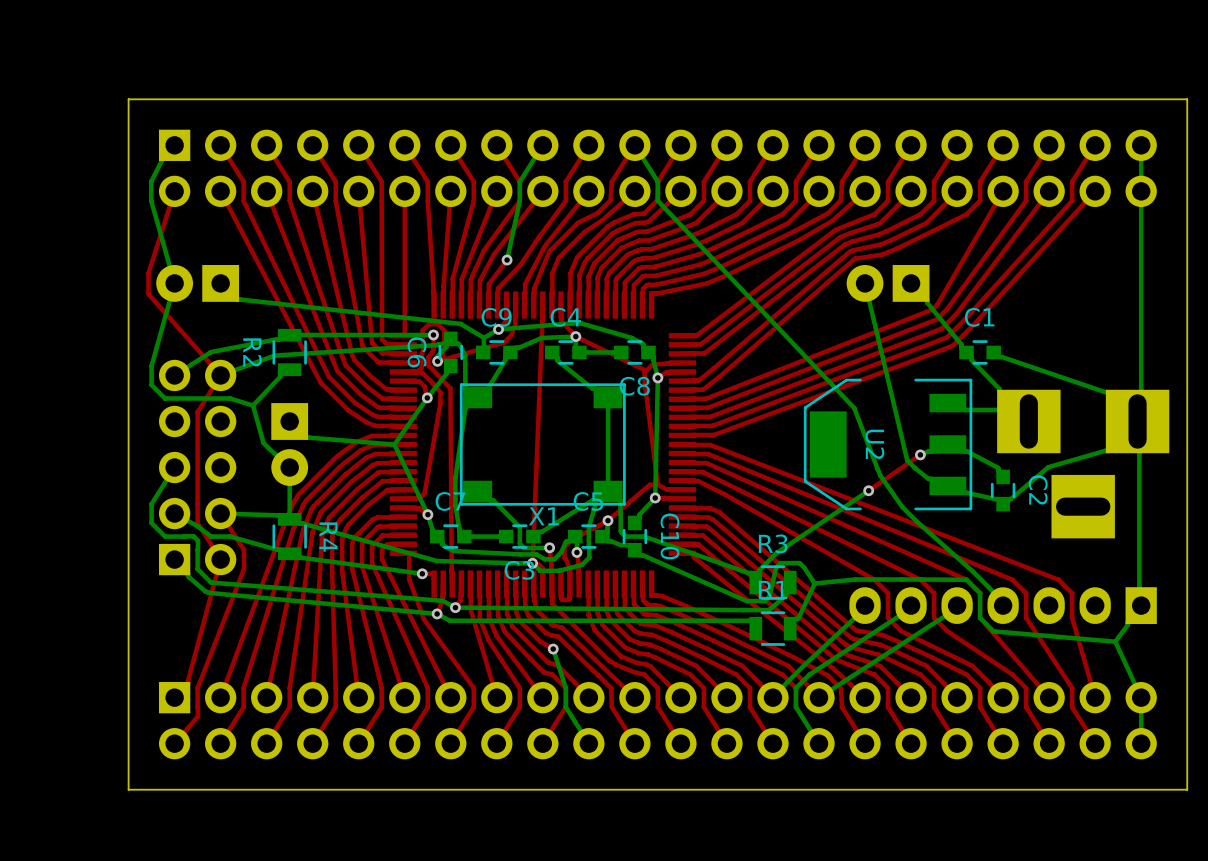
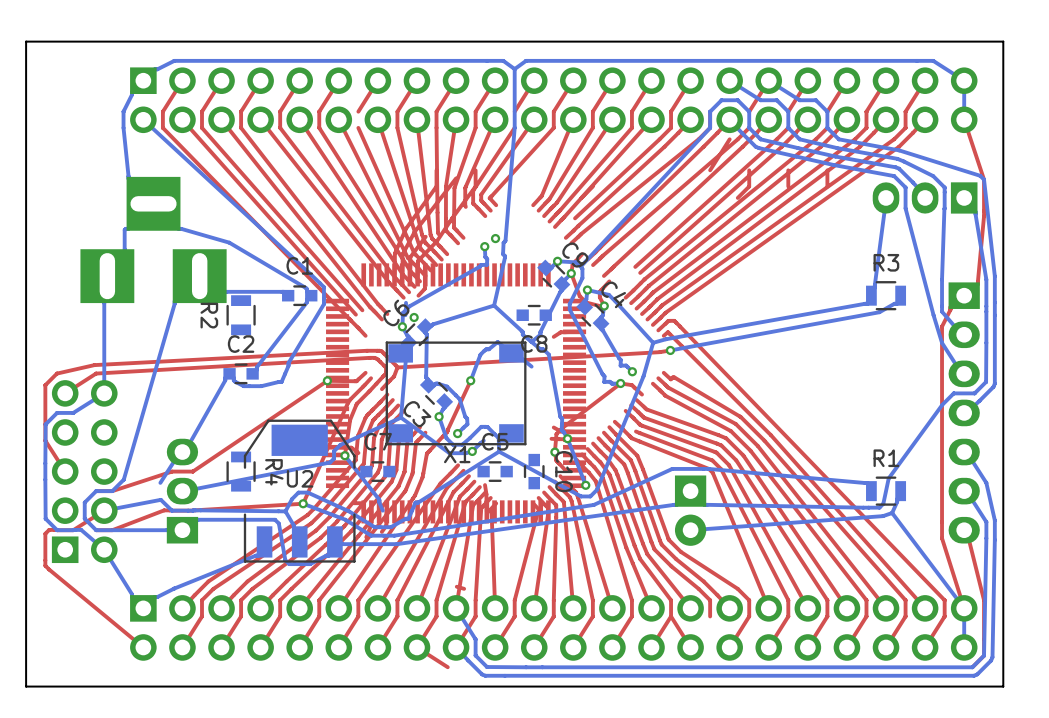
bottom track: none -> (503, 60) (174, 60)
bottom track: none -> (933, 60) (526, 60)
bottom track: none -> (174, 60) (154, 69) (132, 92) (123, 111)
bottom track: none -> (503, 60) (514, 69)
bottom track: none -> (525, 60) (514, 69)
bottom track: none -> (933, 60) (964, 80) (964, 119)
bottom track: none -> (514, 69) (514, 127) (505, 240) (503, 242) (503, 254) (504, 257) (494, 305)
top track: none -> (182, 80) (162, 111)
top track: none -> (221, 80) (202, 111)
top track: none -> (260, 80) (241, 111)
top track: none -> (299, 80) (280, 111)
top track: none -> (338, 80) (319, 111)
top track: none -> (377, 80) (358, 111)
top track: none -> (416, 80) (397, 111)
top track: none -> (456, 80) (436, 111)
bottom track: none -> (729, 80) (760, 100)
bottom track: none -> (768, 80) (799, 100)
bottom track: none -> (721, 100) (710, 111)
bottom track: none -> (737, 100) (749, 111)
bottom track: none -> (737, 100) (721, 100)
bottom track: none -> (776, 100) (788, 111)
bottom track: none -> (776, 100) (760, 100)
bottom track: none -> (815, 100) (827, 111)
bottom track: none -> (815, 100) (799, 100)
board edge: (1187, 99) (128, 99) (128, 789) -> (1003, 100) (1003, 41) (26, 41) (26, 686) (104, 686)
bottom track: none -> (123, 111) (128, 178) (178, 228) (229, 242) (305, 287) (311, 295) (252, 373)
top track: none -> (162, 111) (162, 127)
top track: none -> (241, 111) (241, 127)
top track: none -> (280, 111) (280, 127)
top track: none -> (319, 111) (319, 127)
top track: none -> (397, 111) (397, 127) (422, 234) (425, 242) (441, 259)
top track: none -> (436, 111) (438, 234)
top track: none -> (475, 111) (475, 127) (454, 188) (454, 227) (463, 237)
top track: none -> (553, 111) (553, 127)
bottom track: none -> (749, 111) (749, 127)
bottom track: none -> (788, 111) (788, 127)
bottom track: none -> (827, 111) (827, 127)
bottom track: none -> (143, 119) (323, 287) (323, 304) (288, 363) (281, 381) (261, 386) (243, 386) (234, 381) (229, 373) (225, 377) (184, 452) (180, 452) (160, 482)
top track: none -> (182, 119) (355, 314)
top track: none -> (221, 119) (369, 306) (381, 319)
top track: none -> (260, 119) (388, 282) (403, 297)
top track: none -> (299, 119) (402, 274) (414, 286)
top track: none -> (338, 119) (407, 257) (425, 275)
top track: none -> (377, 119) (418, 244) (420, 249) (436, 265)
top track: none -> (416, 119) (430, 234) (447, 254)
top track: none -> (456, 119) (446, 186) (445, 230) (458, 243)
top track: none -> (495, 119) (465, 188) (465, 206)
top track: none -> (534, 119) (481, 194) (481, 200) (490, 210)
top track: none -> (573, 119) (541, 196) (533, 205)
top track: none -> (612, 119) (557, 202) (544, 216)
top track: none -> (651, 119) (554, 227)
top track: none -> (690, 119) (664, 146) (565, 237)
bottom track: none -> (729, 119) (758, 148) (894, 176)
top track: none -> (729, 119) (587, 259)
top track: none -> (768, 119) (742, 146) (603, 275)
top track: none -> (807, 119) (781, 146) (640, 272)
top track: none -> (846, 119) (820, 146) (649, 285) (631, 303)
top track: none -> (886, 119) (860, 146) (657, 298)
top track: none -> (925, 119) (899, 146) (665, 312) (652, 324)
top track: none -> (964, 119) (984, 179) (984, 216) (977, 284) (950, 307) (942, 326)
top track: none -> (162, 127) (365, 335)
top track: none -> (202, 127) (362, 310)
top track: none -> (241, 127) (387, 314)
top track: none -> (280, 127) (395, 278) (409, 292)
top track: none -> (319, 127) (410, 271) (420, 281)
top track: none -> (358, 127) (414, 253) (430, 270)
top track: none -> (514, 127) (473, 190) (473, 203) (485, 216)
top track: none -> (553, 127) (489, 198) (496, 205)
top track: none -> (592, 127) (549, 199) (538, 210)
top track: none -> (631, 127) (549, 221)
top track: none -> (671, 127) (575, 218)
bottom track: none -> (710, 127) (580, 266)
top track: none -> (710, 127) (571, 243)
bottom track: none -> (749, 127) (760, 139)
top track: none -> (749, 127) (593, 265)
bottom track: none -> (788, 127) (799, 139)
top track: none -> (788, 127) (635, 266)
bottom track: none -> (827, 127) (838, 139)
top track: none -> (827, 127) (815, 139) (644, 279) (625, 297)
top track: none -> (866, 127) (855, 139) (653, 292) (636, 308)
top track: none -> (905, 127) (894, 139) (662, 305)
bottom track: (174, 145) (161, 158) (151, 181) -> none
top track: (220, 145) (243, 181) -> none
top track: (266, 145) (289, 181) -> none
top track: (312, 145) (335, 181) -> none
top track: (358, 145) (381, 181) -> none
top track: (404, 145) (427, 181) -> none
top track: (450, 145) (473, 181) -> none
top track: (496, 145) (519, 181) -> none
bottom track: (542, 145) (519, 181) -> none
top track: (588, 145) (565, 181) -> (495, 80) (475, 111)
bottom track: (634, 145) (657, 181) -> none
top track: (634, 145) (611, 181) -> (534, 80) (514, 111)
top track: (680, 145) (657, 181) -> (573, 80) (553, 111)
top track: (726, 145) (703, 181) -> (612, 80) (592, 111)
top track: (772, 145) (749, 181) -> (651, 80) (631, 111)
top track: (819, 145) (796, 181) -> (690, 80) (671, 111)
bottom track: none -> (760, 139) (835, 156) (895, 167) (912, 182) (925, 197)
top track: (911, 145) (888, 181) -> (768, 80) (749, 111)
bottom track: none -> (799, 139) (897, 158) (933, 176) (944, 187) (942, 311) (961, 334) (964, 334)
top track: (957, 145) (934, 181) -> (807, 80) (788, 111)
bottom track: none -> (838, 139) (899, 150) (980, 175) (984, 179) (994, 276) (994, 383) (979, 400) (964, 412)
top track: (1003, 145) (980, 181) -> (846, 80) (827, 111)
top track: (1049, 145) (1026, 181) -> (886, 80) (866, 111)
top track: (1095, 145) (1072, 181) -> (925, 80) (905, 111)
bottom track: (1141, 145) (1141, 392) (1137, 421) -> none
part position: (657, 168) -> (553, 100)
bottom track: (151, 181) (151, 200) (174, 283) (151, 365) (151, 384) -> none
top track: (243, 181) (243, 200) -> (201, 111) (201, 127)
top track: (289, 181) (289, 200) (345, 365) (382, 398) (403, 399) -> none
top track: (335, 181) (335, 200) (362, 345) (377, 361) (403, 362) -> none
top track: (381, 181) (382, 339) (387, 344) (403, 344) -> none
top track: (427, 181) (434, 304) -> none
top track: (473, 181) (473, 200) (452, 278) (452, 304) -> none
bottom track: (519, 181) (519, 200) (507, 260) -> none
top track: (611, 181) (610, 200) (597, 213) (577, 223) (549, 252) (534, 288) (533, 304) -> none
bottom track: (657, 181) (657, 200) -> (710, 111) (710, 127)
top track: (657, 181) (657, 200) (644, 213) (633, 214) (608, 226) (577, 257) (570, 273) (570, 304) -> none
top track: (703, 181) (703, 200) -> (592, 111) (592, 127)
top track: (749, 181) (749, 200) -> (631, 111) (631, 127)
top track: (795, 181) (795, 200) -> (671, 111) (671, 127)
top track: (842, 181) (840, 200) (828, 213) (703, 273) (646, 285) (642, 288) (642, 304) -> none
top track: (1026, 181) (1026, 200) -> (866, 111) (866, 127)
top track: (1072, 181) (1072, 200) -> (905, 111) (905, 127)
bottom track: none -> (894, 176) (905, 187) (905, 208) (942, 342)
top track: (174, 191) (148, 273) (148, 293) (220, 375) (197, 411) -> none
top track: (220, 191) (321, 383) (348, 410) (366, 422) (375, 425) (403, 426) -> none
top track: (266, 191) (337, 371) (360, 394) (377, 407) (403, 408) -> none
top track: (312, 191) (354, 359) (386, 389) (403, 390) -> none
top track: (358, 191) (372, 342) (382, 353) (403, 353) -> none
top track: (404, 191) (403, 335) -> none
top track: (450, 191) (443, 304) -> none
top track: (496, 191) (461, 279) (461, 304) -> none
top track: (588, 191) (544, 247) (525, 284) (524, 304) -> none
top track: (634, 191) (602, 220) (584, 232) (558, 257) (552, 273) (551, 304) -> none
top track: (680, 191) (649, 221) (635, 223) (612, 233) (587, 258) (579, 275) (579, 304) -> none
top track: (726, 191) (696, 223) (649, 240) (639, 240) (621, 247) (601, 267) (597, 277) (597, 304) -> none
top track: (772, 191) (742, 223) (696, 244) (653, 258) (634, 261) (616, 278) (615, 304) -> none
top track: (819, 191) (788, 223) (718, 257) (700, 264) (658, 275) (642, 276) (633, 285) (633, 304) -> none
top track: (865, 191) (832, 220) (799, 239) (706, 283) (652, 293) (651, 304) -> none
top track: (911, 191) (880, 223) (840, 237) (700, 344) (682, 344) -> none
top track: (957, 191) (926, 223) (880, 244) (849, 251) (699, 380) (682, 381) -> none
top track: (1003, 191) (937, 305) (932, 309) (706, 398) (682, 399) -> none
top track: (1049, 191) (956, 314) (941, 328) (710, 416) (682, 417) -> none
top track: (1095, 191) (952, 345) (713, 434) (682, 435) -> none
top track: (243, 200) (329, 376) (354, 402) (372, 414) (377, 416) (403, 417) -> none
bottom track: (657, 200) (854, 408) (880, 475) (902, 507) (972, 571) (1003, 602) (1003, 605) -> none
top track: (749, 200) (736, 214) (701, 231) (651, 249) (641, 249) (626, 255) (609, 273) (606, 278) (606, 304) -> none
top track: (795, 200) (782, 214) (713, 248) (655, 266) (639, 268) (624, 282) (624, 304) -> none
top track: (934, 200) (920, 214) (886, 231) (844, 244) (704, 353) (682, 353) -> none
top track: (980, 200) (966, 214) (897, 248) (882, 254) (854, 259) (703, 389) (682, 390) -> none
top track: (1026, 200) (947, 309) (936, 319) (707, 407) (682, 408) -> none
top track: (1072, 200) (947, 337) (712, 425) (682, 426) -> none
top track: (690, 214) (647, 231) (637, 231) (617, 240) (594, 263) (592, 267) (588, 277) (588, 304) -> none
top track: (874, 214) (835, 230) (696, 335) (682, 335) -> none
bottom track: none -> (886, 197) (874, 287) (867, 303) (653, 342)
part: none -> (925, 197)
bottom track: none -> (964, 197) (975, 211) (986, 279) (986, 381)
bottom track: none -> (153, 203) (128, 228) (124, 229) (124, 251) (107, 276) (104, 301) (104, 393) (73, 412)
via: (507, 260) -> none
via: none -> (495, 238)
part: none -> (153, 239)
bottom track: none -> (484, 246) (486, 264) (481, 265) (409, 306) (402, 312) (402, 326) (409, 337) (401, 417)
via: none -> (484, 246)
top track: none -> (582, 254) (572, 264) (571, 273) (579, 295) (586, 302) (604, 306) (599, 297) (599, 292) (609, 281)
part: (197, 283) -> none
bottom track: (220, 283) (236, 299) (460, 323) (483, 337) (498, 329) (581, 323) (631, 337) (642, 343) (643, 347) (653, 356) (657, 377) (655, 497) (639, 514) (639, 517) (634, 522) -> none
bottom track: (865, 283) (907, 460) (928, 478) (964, 492) (998, 499) (1003, 504) (1048, 467) (1108, 450) (1137, 421) -> none
part: (888, 283) -> none
bottom track: (911, 283) (927, 299) (927, 302) (961, 344) (961, 347) (971, 356) (971, 360) (1028, 421) (999, 410) (964, 410) (947, 403) -> none
via: none -> (557, 261)
bottom track: none -> (580, 266) (575, 262) (557, 261) (550, 267) (545, 267)
bottom track: none -> (580, 266) (582, 278) (569, 304) (569, 309) (604, 376) (604, 382) (620, 383)
bottom track: none -> (571, 273) (561, 284) (562, 290) (540, 334) (531, 342)
via: none -> (571, 273)
top track: (515, 304) (515, 324) (511, 334) (504, 342) (437, 361) (442, 355) (444, 330) (437, 324) (429, 324) (422, 330) (421, 367) (417, 371) (403, 372) (421, 372) (440, 392) (440, 403) (424, 493) (419, 498) (403, 498) -> none
top track: (542, 304) (532, 563) (538, 564) (542, 568) (542, 584) -> none
top track: (560, 304) (561, 321) (575, 336) (646, 370) -> none
via: none -> (587, 290)
bottom track: none -> (288, 295) (283, 291) (224, 291) (199, 276) (174, 301) (123, 479)
via: (498, 329) -> none
bottom track: none -> (900, 295) (897, 303) (879, 312) (670, 350)
top track: none -> (657, 298) (642, 314)
bottom track: (433, 334) (289, 335) (280, 339) (211, 352) -> none
via: (433, 334) -> none
top track: (433, 335) (433, 349) (428, 357) (428, 365) (450, 388) (452, 584) -> none
via: (575, 336) -> none
bottom track: none -> (494, 305) (425, 326) (426, 377) (428, 385) (437, 383) (447, 386) (459, 399) (467, 424) (457, 433)
bottom track: none -> (494, 305) (522, 331) (522, 334) (548, 354) (562, 418) (561, 430) (567, 438) (585, 485)
bottom track: none -> (604, 306) (600, 317) (601, 329) (620, 359) (620, 365) (626, 365) (632, 371)
via: none -> (604, 306)
top track: none -> (661, 305) (647, 319)
bottom track: none -> (584, 307) (587, 290) (608, 294) (653, 342)
bottom track: (446, 343) (274, 355) (220, 375) -> none
bottom track: (446, 343) (446, 347) (437, 356) (437, 361) -> none
bottom track: (446, 343) (450, 338) (455, 343) (459, 345) (465, 355) (465, 388) (477, 397) -> none
bottom track: (210, 352) (174, 375) -> none
C6 rotation: 0° (450, 352) -> 45° clockwise (416, 334)
C6 position: (450, 352) -> (416, 334)
C9 rotation: 0° (496, 352) -> 45° clockwise (553, 276)
C9 position: (496, 352) -> (553, 276)
bottom track: (552, 352) (557, 356) (558, 361) (592, 388) (595, 388) (608, 397) (608, 491) -> none
C4 rotation: 0° (565, 352) -> 45° clockwise (592, 315)
C4 position: (565, 352) -> (592, 315)
bottom track: (621, 352) (579, 352) (575, 347) (575, 336) (541, 337) (515, 347) (505, 356) (489, 388) (465, 406) (455, 477) (455, 505) (459, 532) (464, 536) (506, 536) -> none
C1 position: (980, 352) -> (299, 295)
bottom track: (993, 352) (998, 356) (1108, 392) (1137, 421) -> none
via: none -> (414, 317)
via: (437, 361) -> none
top track: (682, 362) (652, 364) (646, 370) -> none
top track: none -> (942, 326) (942, 538) (964, 608)
bottom track: (450, 366) (394, 444) -> none
via: none -> (402, 326)
bottom track: (289, 369) (280, 373) (280, 376) (253, 405) -> none
top track: (646, 370) (644, 383) (657, 484) (649, 484) (607, 520) (571, 539) (564, 547) (564, 557) (569, 568) (568, 599) (561, 598) (560, 584) -> none
top track: none -> (658, 330) (668, 321) (674, 320) (944, 600)
via: (657, 377) -> none
top track: (403, 381) (420, 381) (424, 386) (427, 397) -> none
bottom track: none -> (653, 342) (643, 376) (596, 489) (590, 496) (581, 496) (499, 451)
bottom track: (151, 385) (165, 398) -> none
bottom track: none -> (942, 343) (961, 373) (964, 373)
top track: none -> (670, 350) (397, 367)
via: none -> (670, 350)
via: (427, 397) -> none
bottom track: (165, 398) (230, 398) (253, 405) -> none
bottom track: (253, 405) (263, 443) (289, 467) (289, 519) -> none
top track: (197, 412) (197, 523) -> none
bottom track: none -> (531, 366) (497, 342) (480, 354) (470, 380)
top track: none -> (397, 367) (394, 376) (381, 389)
top track: none -> (397, 367) (381, 351) (367, 350) (94, 365) (57, 373)
via: none -> (632, 371)
top track: none -> (365, 372) (356, 381) (327, 380) (192, 471) (172, 471) (112, 491) (96, 491)
top track: none -> (56, 373) (45, 385)
top track: none -> (95, 373) (65, 393)
top track: none -> (96, 373) (374, 357) (386, 367) (385, 373) (356, 404) (350, 419) (344, 455)
bottom track: (289, 421) (305, 437) (394, 444) -> none
bottom track: (1137, 421) (1141, 605) (1115, 641) -> none
top track: none -> (371, 378) (347, 403) (303, 503) (192, 510) (164, 510) (112, 530) (96, 530)
via: none -> (327, 380)
via: none -> (470, 380)
bottom track: none -> (986, 381) (974, 393) (953, 393) (942, 404) (888, 478) (883, 503) (879, 507) (704, 504) (690, 491) (676, 504) (397, 544) (340, 544) (334, 541) (329, 555) (310, 564) (289, 564) (285, 560) (278, 523) (275, 519) (196, 519) (182, 530) (96, 530)
via: none -> (620, 383)
top track: none -> (45, 385) (45, 440)
top track: (403, 435) (371, 435) (355, 442) (333, 459) (298, 494) (283, 526) (220, 697) -> (387, 394) (365, 417) (358, 435) (355, 460) (314, 508) (307, 514) (208, 581) (182, 608)
part: (289, 444) -> none
bottom track: (394, 444) (427, 514) (432, 532) (442, 541) (443, 545) (453, 551) (536, 554) (544, 559) (554, 559) (561, 552) (565, 542) (575, 536) (576, 552) -> none
top track: (403, 444) (373, 444) (361, 450) (339, 467) (303, 505) (293, 528) (243, 688) -> (392, 400) (372, 420) (366, 436) (363, 463) (322, 511) (311, 523) (213, 588) (202, 600)
top track: (682, 444) (710, 444) (1058, 579) -> none
U2 rotation: 0° (888, 444) -> 90° clockwise (299, 491)
U2 position: (888, 444) -> (299, 491)
top track: none -> (642, 394) (632, 385) (620, 383) (556, 434) (554, 452) (556, 460) (565, 470)
top track: (403, 453) (375, 454) (366, 457) (345, 474) (311, 509) (303, 529) (266, 697) -> (398, 405) (379, 424) (374, 438) (370, 468) (329, 516) (316, 530) (247, 581) (221, 608)
top track: (682, 453) (708, 454) (1012, 579) (1026, 593) (1026, 617) (1072, 688) -> (663, 372) (670, 379) (674, 377) (741, 417) (764, 440) (905, 600)
bottom track: none -> (444, 401) (444, 407) (439, 416) (446, 438) (453, 444) (462, 444) (481, 426) (487, 427) (498, 438) (499, 451)
bottom track: (920, 454) (947, 444) (967, 451) (997, 467) (1003, 476) -> none
top track: (920, 454) (868, 490) -> none
via: (920, 454) -> none
top track: (403, 462) (377, 463) (372, 465) (351, 481) (320, 513) (312, 534) (289, 688) -> (403, 410) (386, 429) (381, 439) (380, 466) (377, 472) (337, 521) (320, 537) (252, 588) (241, 600)
top track: (682, 462) (706, 463) (966, 579) (980, 593) (980, 617) (1049, 697) -> (658, 378) (668, 387) (735, 423) (757, 445) (886, 608)
part: (1083, 464) -> none
bottom track: none -> (57, 412) (45, 424)
bottom track: none -> (73, 412) (57, 412)
bottom track: (174, 467) (151, 503) -> none
part position: (197, 467) -> (84, 471)
top track: (403, 471) (377, 472) (357, 489) (332, 514) (322, 534) (312, 697) -> (393, 432) (390, 441) (388, 468) (384, 477) (344, 526) (260, 608)
via: none -> (439, 416)
top track: (682, 471) (703, 472) (920, 579) (934, 593) (934, 617) (947, 631) (1012, 674) (1026, 688) -> (652, 383) (665, 395) (730, 431) (750, 450) (866, 600)
bottom track: none -> (401, 417) (340, 444) (334, 451) (334, 458)
bottom track: none -> (401, 417) (449, 453)
top track: (403, 480) (382, 481) (340, 519) (332, 536) (335, 688) -> (400, 436) (396, 470) (391, 481) (351, 531) (280, 600)
top track: (682, 480) (698, 481) (725, 494) (874, 579) (888, 593) (888, 617) (901, 631) (972, 665) (1003, 697) -> (636, 400) (646, 409) (726, 438) (743, 455) (846, 608)
bottom track: none -> (45, 424) (45, 518)
top track: none -> (420, 427) (407, 439) (404, 471)
top track: (403, 489) (387, 490) (367, 505) (348, 524) (342, 538) (342, 570) (358, 697) -> (398, 486) (299, 608)
C2 name position: C2 (1038, 489) -> C2 (241, 344)
bottom track: (868, 490) (776, 553) (759, 569) (755, 582) (751, 573) (644, 536) (625, 536) (620, 531) (620, 500) (608, 491) -> none
via: (868, 490) -> none
C2 rotation: 0° (1003, 490) -> 90° clockwise (241, 373)
C2 position: (1003, 490) -> (241, 373)
bottom track: (477, 491) (489, 500) (493, 500) (519, 527) (519, 543) (524, 547) (549, 547) -> none
via: none -> (457, 433)
via: (655, 497) -> none
via: none -> (567, 438)
top track: none -> (598, 438) (624, 464) (654, 549) (710, 600)
bottom track: none -> (483, 440) (472, 451) (449, 453)
bottom track: (595, 500) (588, 527) (589, 557) (582, 564) (559, 570) (540, 570) (532, 563) (437, 561) (299, 523) (280, 515) (220, 513) -> none
bottom track: (595, 500) (592, 500) (533, 536) -> none
bottom track: (151, 504) (151, 523) -> (84, 502) (84, 518)
top track: (682, 507) (710, 508) (719, 512) (855, 630) (882, 635) (897, 641) (966, 674) (980, 688) -> (631, 405) (643, 417) (721, 445) (736, 460) (827, 600)
via: none -> (472, 451)
bottom track: (174, 513) (211, 536) -> none
top track: (220, 513) (243, 549) -> (45, 440) (65, 471)
bottom track: none -> (499, 451) (415, 502) (408, 518) (390, 527) (374, 527) (348, 511) (307, 492) (298, 492) (292, 499) (285, 511)
via: none -> (554, 452)
bottom track: none -> (964, 452) (966, 452) (986, 482)
via position: (427, 514) -> (344, 455)
top track: (403, 516) (377, 517) (372, 519) (355, 536) (352, 543) (352, 568) (381, 688) -> (425, 432) (416, 442) (412, 474) (405, 490) (319, 600)
top track: (682, 516) (708, 517) (713, 519) (851, 637) (880, 644) (926, 665) (957, 697) -> (625, 410) (640, 424) (716, 452) (729, 465) (807, 608)
bottom track: none -> (344, 455) (379, 499) (382, 510)
bottom track: (607, 520) (607, 532) (602, 536) (607, 541) (620, 545) (630, 545) (639, 555) (746, 601) (764, 601) (768, 597) (776, 567) (780, 563) (799, 563) (814, 583) -> none
via: (607, 520) -> none
bottom track: none -> (334, 458) (330, 462) (182, 491)
bottom track: (151, 523) (165, 536) -> (84, 518) (96, 530)
top track: (197, 523) (220, 559) (188, 684) (174, 697) -> none
top track: (403, 526) (377, 527) (362, 543) (362, 566) (404, 697) -> (470, 380) (447, 432) (426, 453) (422, 477) (415, 495) (338, 608)
top track: (682, 526) (707, 527) (846, 645) (878, 654) (920, 674) (934, 688) -> (635, 431) (712, 460) (721, 469) (788, 600)
top track: (403, 535) (382, 535) (372, 546) (372, 563) (427, 688) -> (458, 465) (440, 483) (358, 600)
top track: (682, 535) (703, 535) (838, 650) (880, 666) (911, 697) -> (614, 421) (631, 438) (708, 468) (712, 472) (768, 608)
bottom track: (165, 536) (193, 536) (197, 540) (197, 569) -> none
bottom track: (211, 536) (230, 536) (280, 549) (299, 557) (422, 573) -> none
top track: none -> (404, 471) (398, 486)
C3 rotation: 0° (519, 536) -> 45° clockwise (436, 393)
C3 position: (519, 536) -> (436, 393)
top track: (403, 544) (386, 545) (382, 549) (382, 559) (450, 697) -> (463, 470) (447, 487) (377, 608)
top track: (682, 544) (699, 545) (836, 659) (874, 674) -> (609, 427) (637, 455) (668, 539) (680, 551) (737, 588)
bottom track: none -> (123, 479) (112, 491)
top track: (549, 547) (552, 603) (608, 660) -> none
via: (549, 547) -> none
top track: (244, 550) (244, 569) (197, 688) (197, 716) (174, 743) -> (73, 530) (49, 529) (45, 533) (45, 565) (143, 647)
bottom track: none -> (986, 483) (994, 520) (992, 657) (974, 675) (485, 675) (456, 647)
via: (576, 552) -> none
via: none -> (585, 485)
top track: (403, 553) (409, 553) (409, 579) (423, 619) (473, 688) -> (468, 476) (453, 492) (397, 600)
top track: (682, 553) (693, 553) (695, 558) (832, 668) (865, 697) -> (603, 432) (630, 460) (661, 544) (703, 581) (729, 608)
bottom track: none -> (96, 491) (84, 502)
bottom track: none -> (112, 491) (96, 491)
bottom track: (174, 559) (188, 572) (189, 577) (209, 592) (437, 613) (449, 620) (751, 620) (755, 628) -> none
part: none -> (182, 491)
bottom track: none -> (871, 491) (867, 483) (708, 468) (672, 468) (593, 504)
bottom track: none -> (900, 491) (892, 513)
bottom track: none -> (964, 491) (966, 491) (986, 521)
via: (532, 563) -> none
bottom track: (197, 569) (211, 582) -> (45, 518) (57, 530)
via: (422, 573) -> none
bottom track: none -> (303, 503) (345, 519) (371, 535) (394, 535) (593, 504)
via: none -> (303, 503)
bottom track: (966, 579) (980, 593) (980, 617) (993, 631) -> none
bottom track: (966, 579) (855, 579) (814, 583) -> none
top track: (1058, 579) (1072, 593) (1072, 617) (1095, 697) -> (663, 335) (667, 332) (770, 435) (925, 608)
bottom track: none -> (104, 510) (160, 499) (171, 510) (285, 511)
top track: none -> (104, 510) (73, 530)
R3 position: (772, 582) -> (886, 295)
bottom track: (790, 582) (786, 595) (768, 610) (455, 607) (442, 600) (211, 582) -> none
part: none -> (690, 510)
bottom track: none -> (285, 511) (293, 525) (299, 541)
bottom track: (814, 583) (798, 617) (794, 619) (790, 628) -> none
top track: (470, 584) (470, 610) (496, 697) -> (474, 481) (460, 496) (416, 608)
top track: (479, 584) (480, 620) (488, 640) (519, 688) -> (479, 487) (465, 502) (436, 600)
top track: (488, 584) (488, 616) (496, 635) (542, 697) -> (485, 492) (473, 505) (456, 608)
top track: (497, 584) (497, 615) (504, 631) (543, 672) -> none
top track: (506, 584) (507, 613) (512, 626) (547, 662) (558, 665) (588, 697) -> (496, 503) (489, 510) (491, 512) (495, 608)
top track: (515, 584) (516, 612) (519, 621) (540, 641) (553, 649) -> none
top track: (524, 584) (525, 604) (528, 615) (545, 632) (558, 636) (611, 688) (611, 707) -> (533, 503) (539, 510) (514, 600) (514, 616)
top track: (533, 584) (536, 609) (551, 624) (562, 627) (634, 697) -> (538, 497) (547, 507) (548, 513) (534, 608)
top track: (588, 584) (588, 615) (594, 630) (620, 656) (650, 666) (680, 697) -> (549, 487) (563, 502) (573, 608)
top track: (597, 584) (597, 613) (602, 624) (624, 647) (655, 657) (690, 674) (703, 688) -> (554, 481) (571, 501) (592, 600)
top track: (606, 584) (606, 611) (610, 619) (629, 639) (650, 644) (696, 665) (726, 697) -> (560, 476) (575, 492) (577, 497) (612, 608)
top track: (615, 584) (615, 609) (617, 614) (634, 631) (652, 634) (701, 657) (736, 674) (749, 688) -> (576, 459) (595, 481) (631, 600)
top track: (624, 584) (624, 607) (639, 623) (654, 625) (672, 632) (742, 665) (772, 697) -> (582, 454) (602, 478) (626, 547) (651, 608)
top track: (633, 584) (633, 603) (644, 614) (657, 615) (676, 623) (748, 657) (782, 674) (795, 688) -> (587, 448) (609, 474) (640, 559) (671, 600)
top track: (642, 584) (642, 600) (648, 604) (660, 606) (681, 614) (788, 665) (819, 697) -> (593, 443) (615, 470) (647, 554) (690, 608)
top track: (651, 584) (652, 595) (663, 596) (686, 606) (828, 675) (841, 688) (842, 707) -> (710, 600) (710, 616)
bottom track: none -> (892, 513) (883, 516) (690, 530)
bottom track: none -> (986, 522) (984, 655)
bottom track: none -> (57, 530) (81, 529) (104, 549) (132, 597) (143, 608) (154, 597) (174, 588)
bottom track: (865, 605) (865, 608) (772, 697) -> none
bottom track: (911, 605) (911, 608) (809, 674) (796, 688) -> none
bottom track: (957, 605) (957, 608) (819, 697) -> none
part rotation: 0° (1003, 605) -> 90° counterclockwise (964, 412)
part position: (1003, 605) -> (964, 412)
top track: none -> (964, 530) (966, 530) (984, 600) (984, 655)
via: (455, 607) -> none
via: (437, 613) -> none
bottom track: none -> (264, 541) (258, 555) (174, 588)
R1 position: (772, 628) -> (886, 491)
bottom track: (993, 631) (1115, 641) -> none
bottom track: (1115, 641) (1141, 697) -> (892, 513) (964, 608)
bottom track: (553, 649) (565, 688) (565, 707) -> none
via: (553, 649) -> none
top track: (609, 660) (633, 672) (644, 674) -> none
top track: (552, 674) (565, 688) -> (490, 497) (481, 508) (475, 600)
top track: (644, 674) (657, 688) -> (544, 492) (556, 505) (553, 600)
bottom track: (795, 688) (795, 707) -> (475, 639) (475, 655)
top track: none -> (944, 600) (944, 616)
bottom track: (565, 707) (588, 743) -> (456, 608) (475, 639)
top track: (611, 707) (634, 743) -> (553, 616) (534, 647)
top track: none -> (514, 616) (495, 647)
top track: (657, 707) (680, 743) -> (592, 616) (573, 647)
top track: (703, 707) (726, 743) -> (631, 616) (612, 647)
top track: (749, 707) (772, 743) -> (671, 616) (651, 647)
bottom track: (796, 707) (819, 743) -> none
top track: (842, 707) (865, 743) -> (749, 616) (729, 647)
top track: (888, 707) (911, 743) -> (788, 616) (768, 647)
top track: (934, 707) (957, 743) -> (827, 616) (807, 647)
top track: (980, 707) (1003, 743) -> (866, 616) (846, 647)
top track: (1026, 707) (1049, 743) -> (905, 616) (886, 647)
top track: (1072, 707) (1095, 743) -> (944, 616) (925, 647)
top track: none -> (416, 647) (447, 667)
bottom track: none -> (475, 655) (487, 666)
bottom track: none -> (983, 655) (972, 667)
bottom track: none -> (487, 667) (972, 667)

